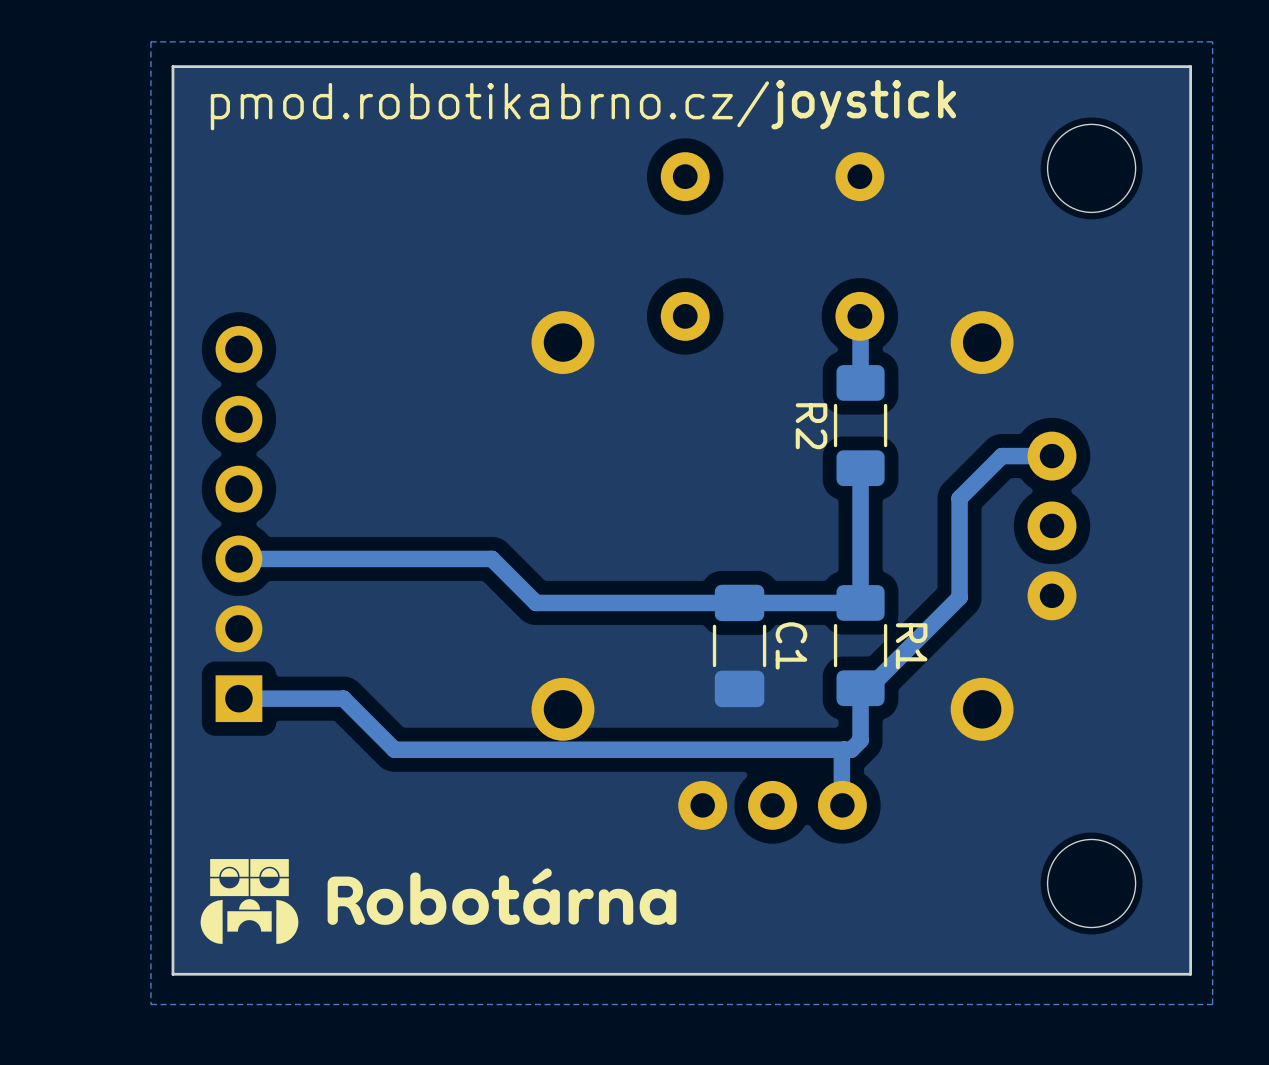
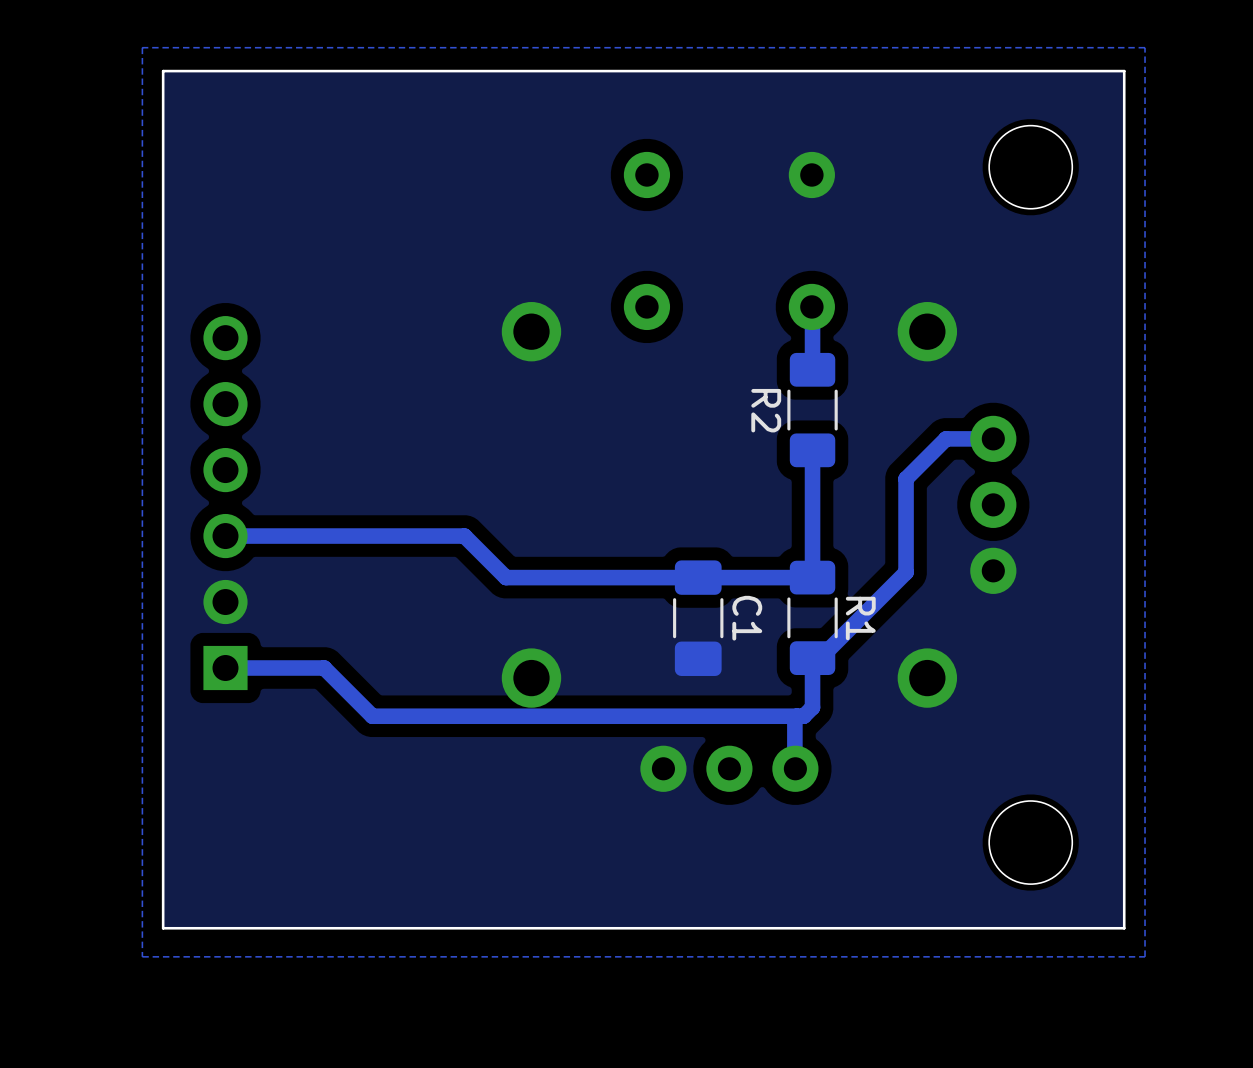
text: joystick (863, 104) -> none
text: pmod.robotikabrno.cz/ (489, 105) -> none
drawing: [200, 859, 677, 944] -> none

